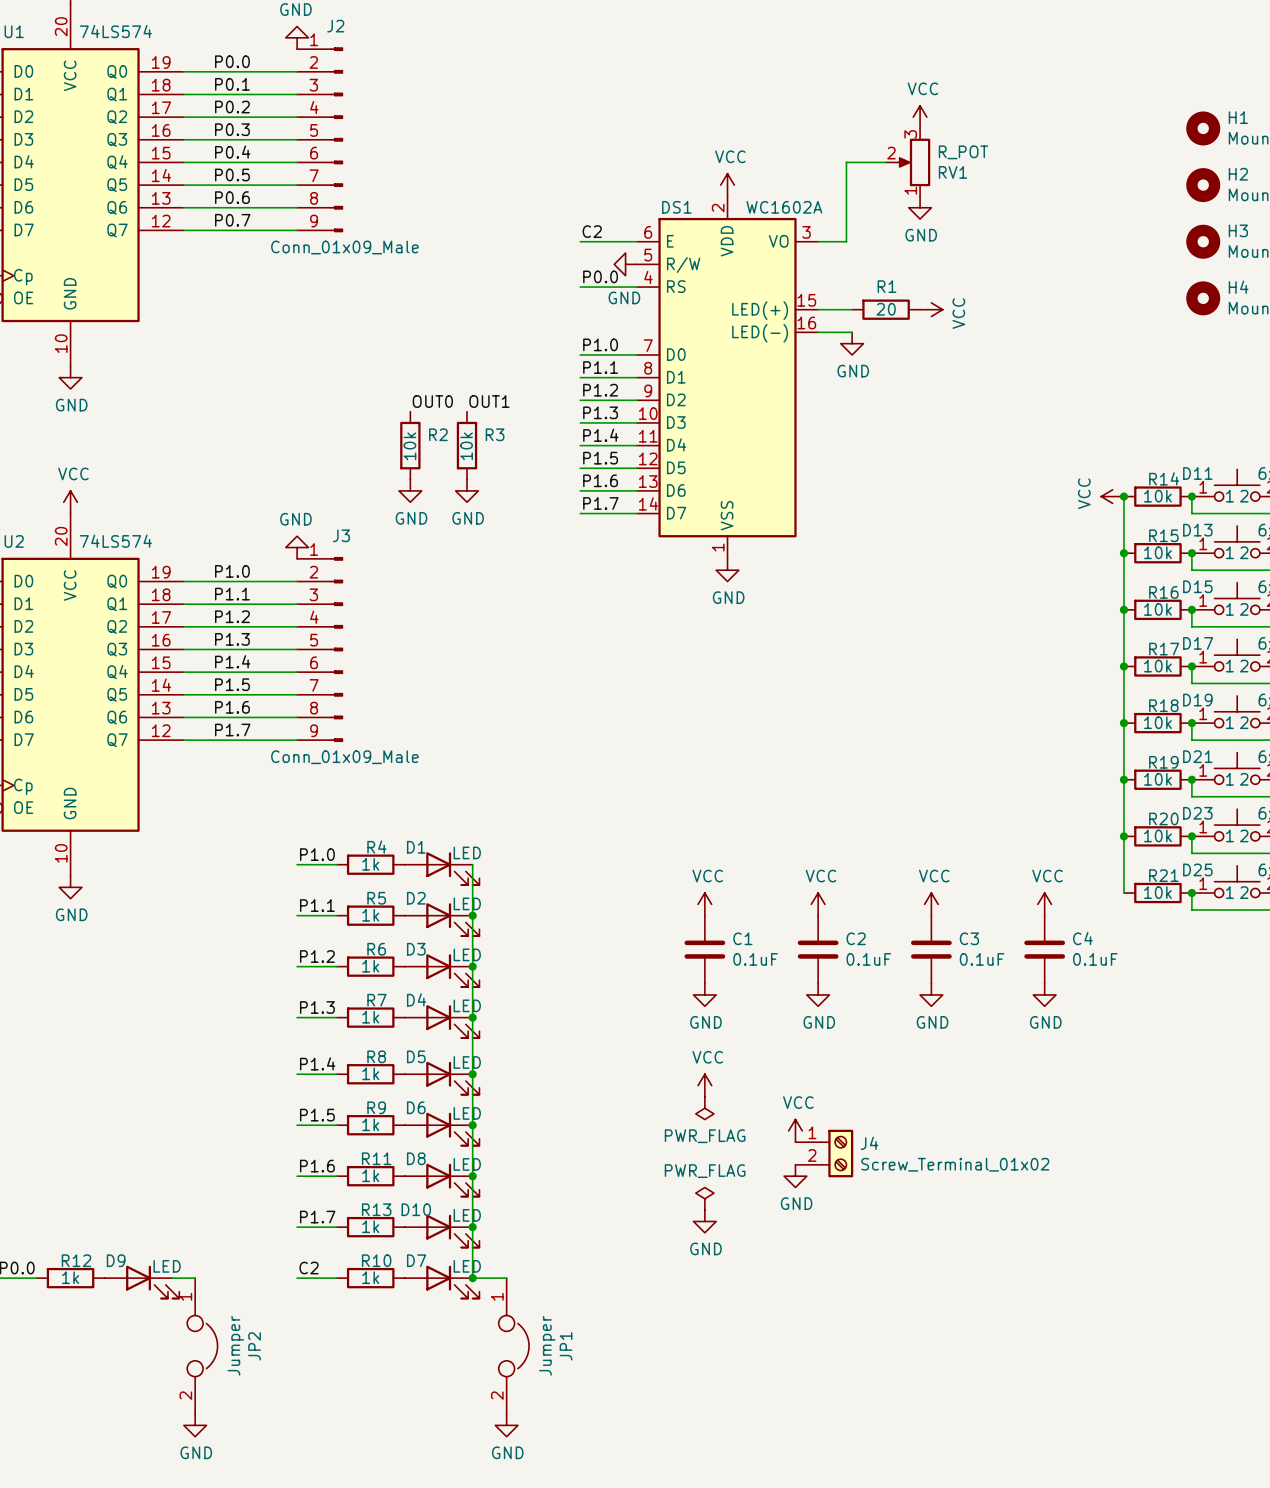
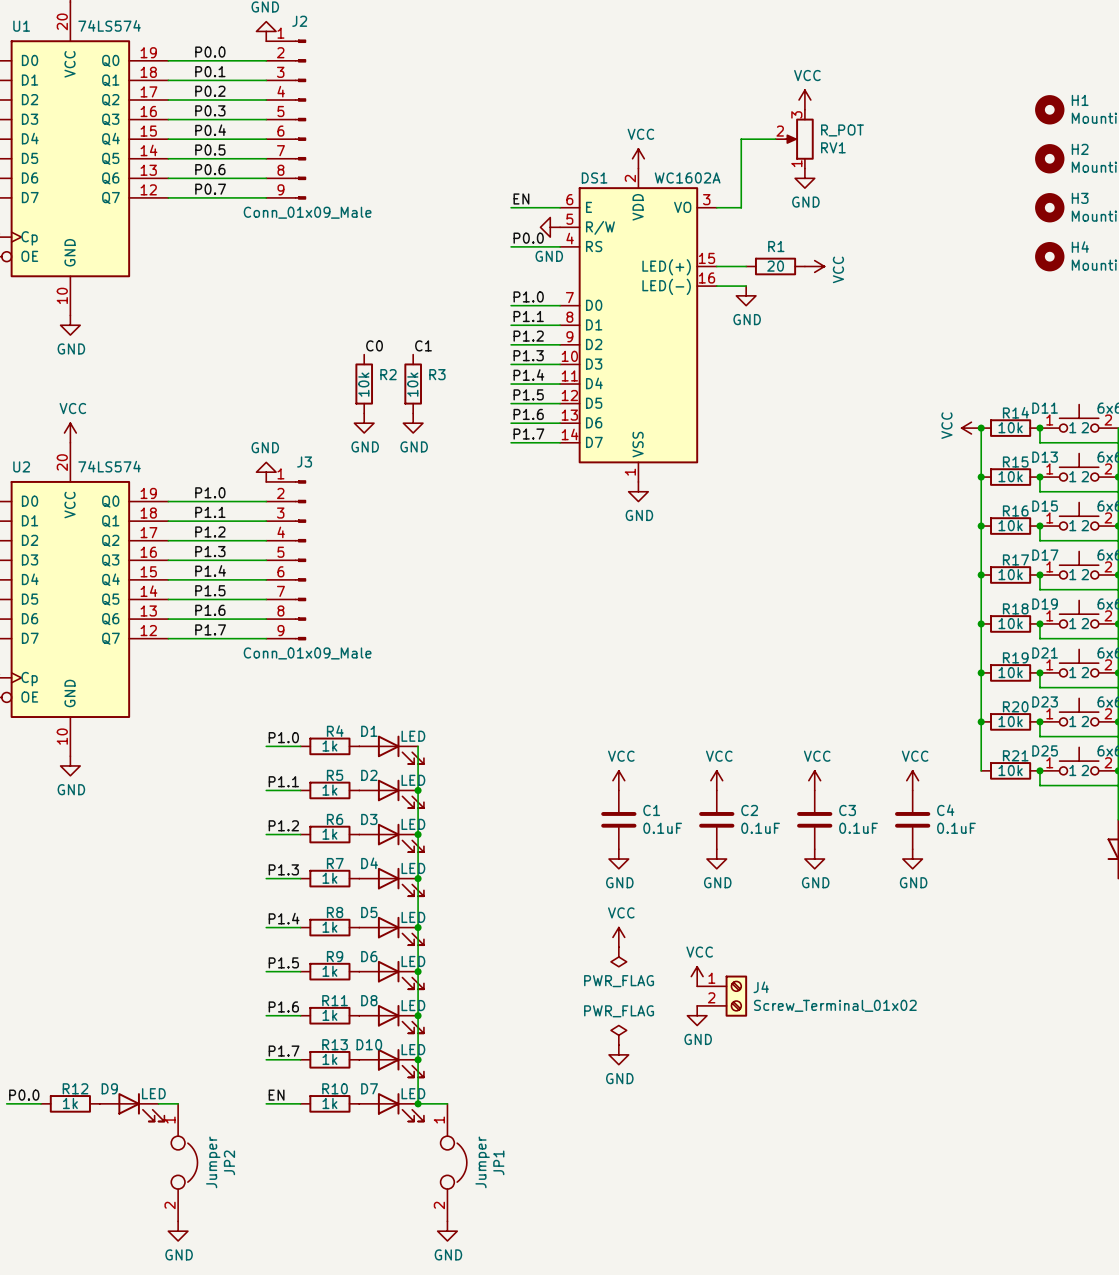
label: C2 (592, 231) -> EN (521, 198)
label: OUT0 (432, 401) -> C0 (374, 345)
label: OUT1 (489, 401) -> C1 (423, 345)
label: C2 (309, 1268) -> EN (276, 1095)

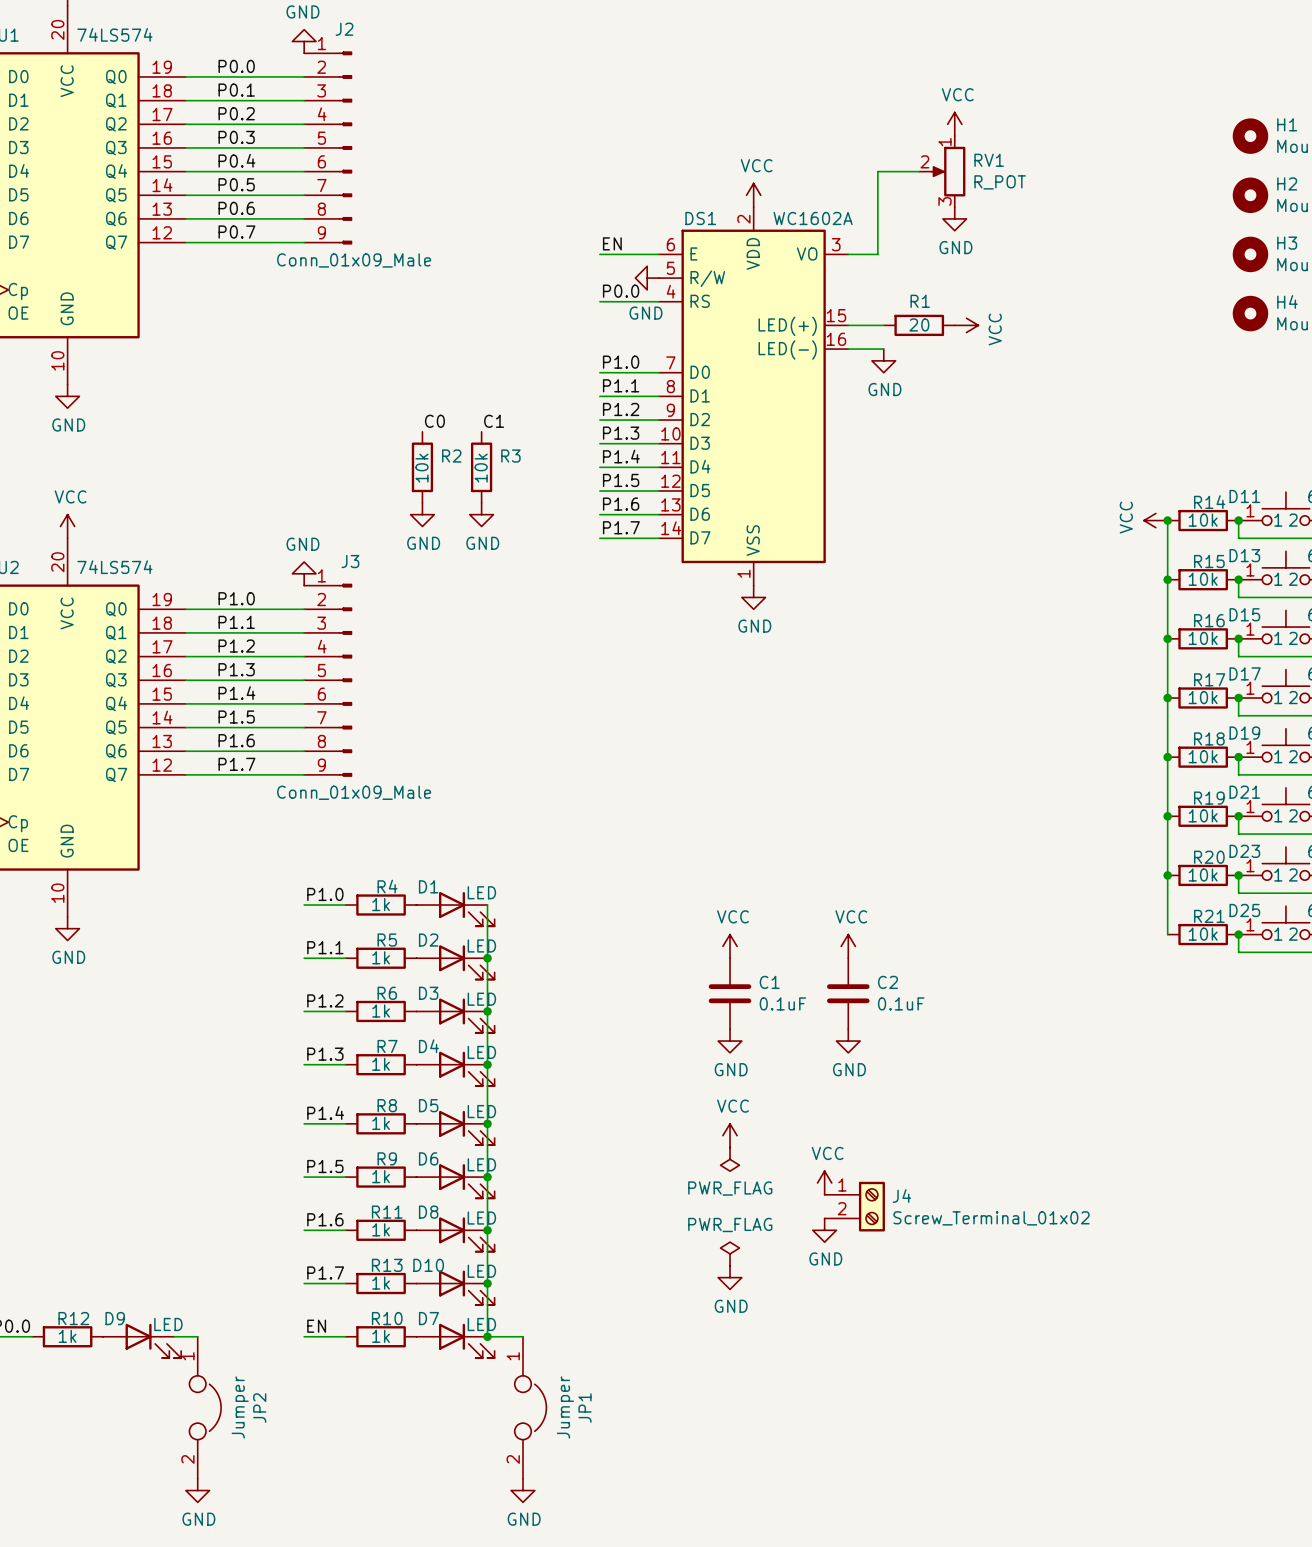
RV1 flip: as is (799, 139) -> up-down (948, 171)
power symbol: VCC (814, 780) -> none
power symbol: VCC (912, 780) -> none
C3: 0.1uF (814, 819) -> none
C4: 0.1uF (912, 819) -> none
power symbol: GND (814, 859) -> none
power symbol: GND (912, 859) -> none

